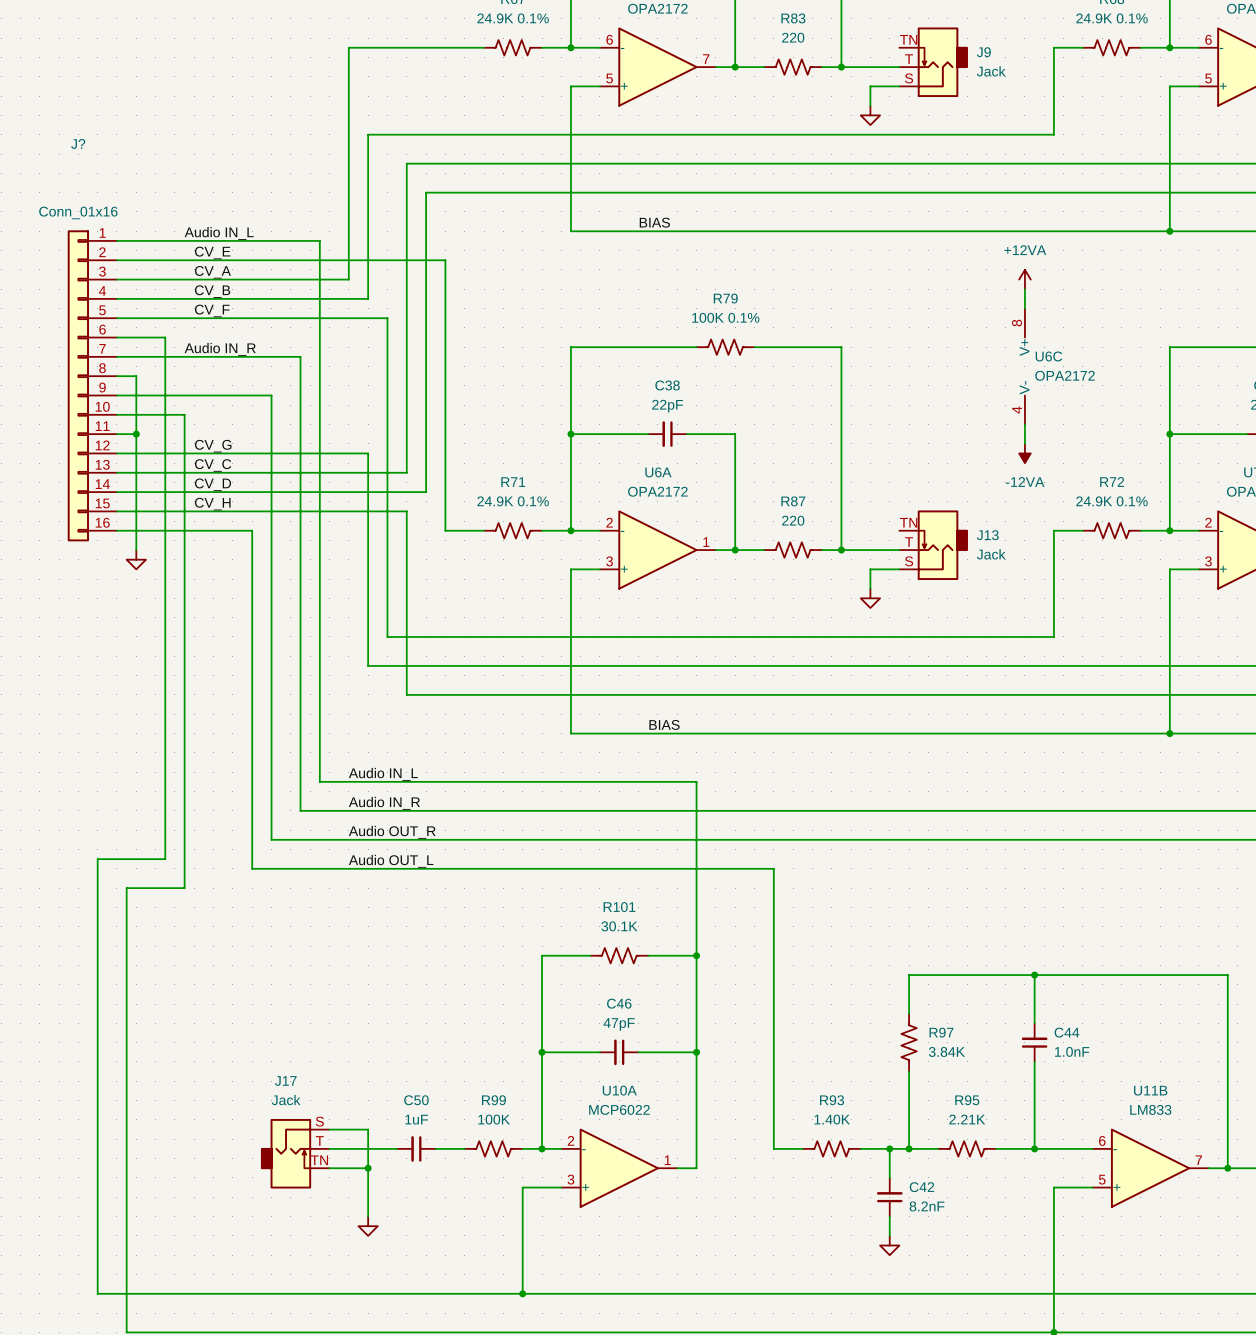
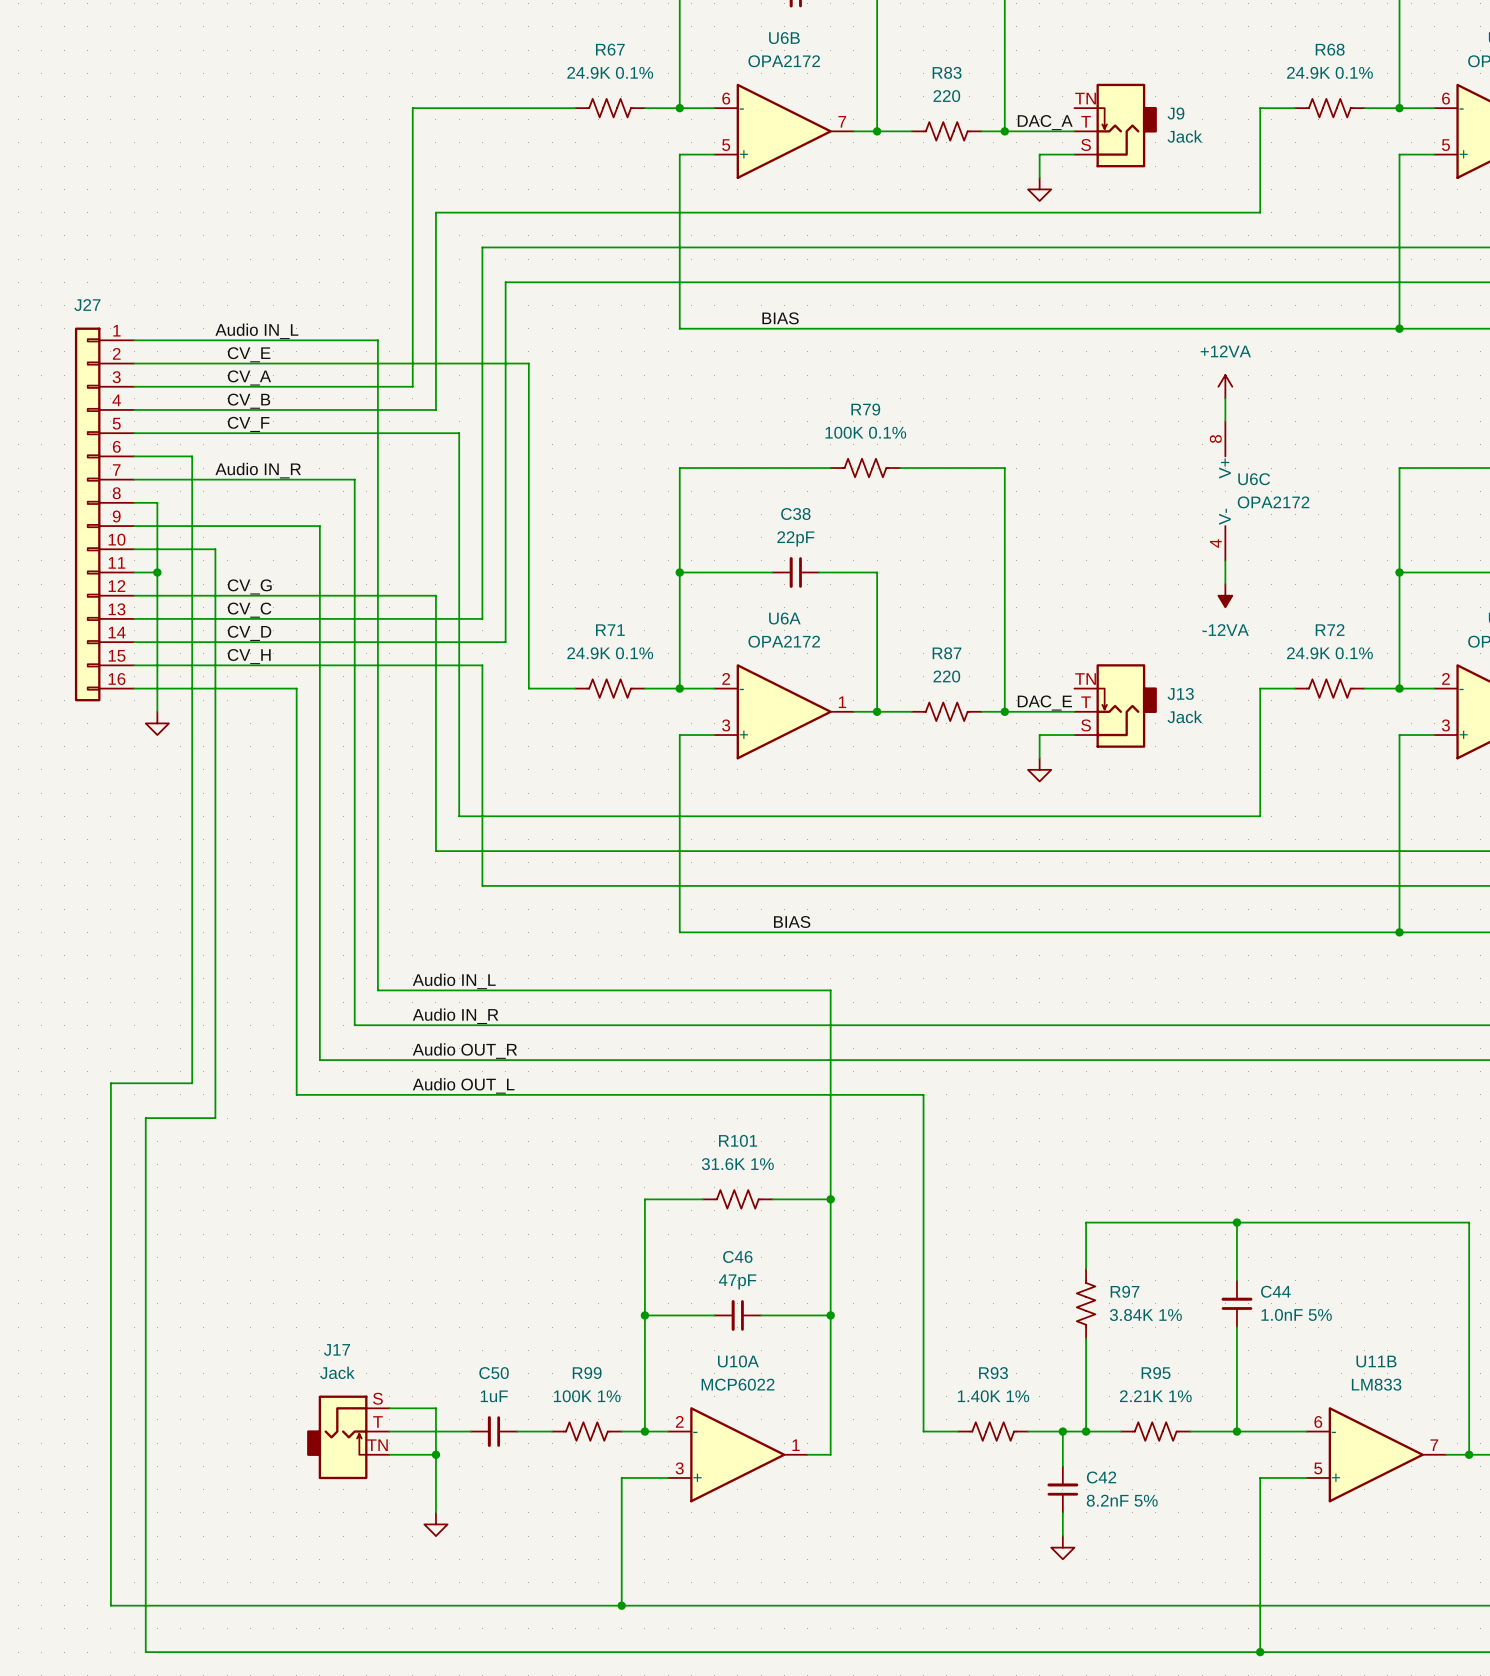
label: none -> DAC_A (1045, 122)
J? name: J? (78, 143) -> J27 (87, 305)
J? value: Conn_01x16 (78, 212) -> none
label: none -> DAC_E (1044, 703)
R101 value: 30.1K (619, 926) -> 31.6K 1% (737, 1164)
R97 value: 3.84K (946, 1051) -> 3.84K 1% (1145, 1315)
C44 value: 1.0nF (1072, 1051) -> 1.0nF 5% (1296, 1314)
R99 value: 100K (494, 1119) -> 100K 1% (587, 1396)
R93 value: 1.40K (832, 1119) -> 1.40K 1% (993, 1396)
R95 value: 2.21K (967, 1119) -> 2.21K 1% (1155, 1396)
C42 value: 8.2nF (927, 1206) -> 8.2nF 5% (1122, 1500)

